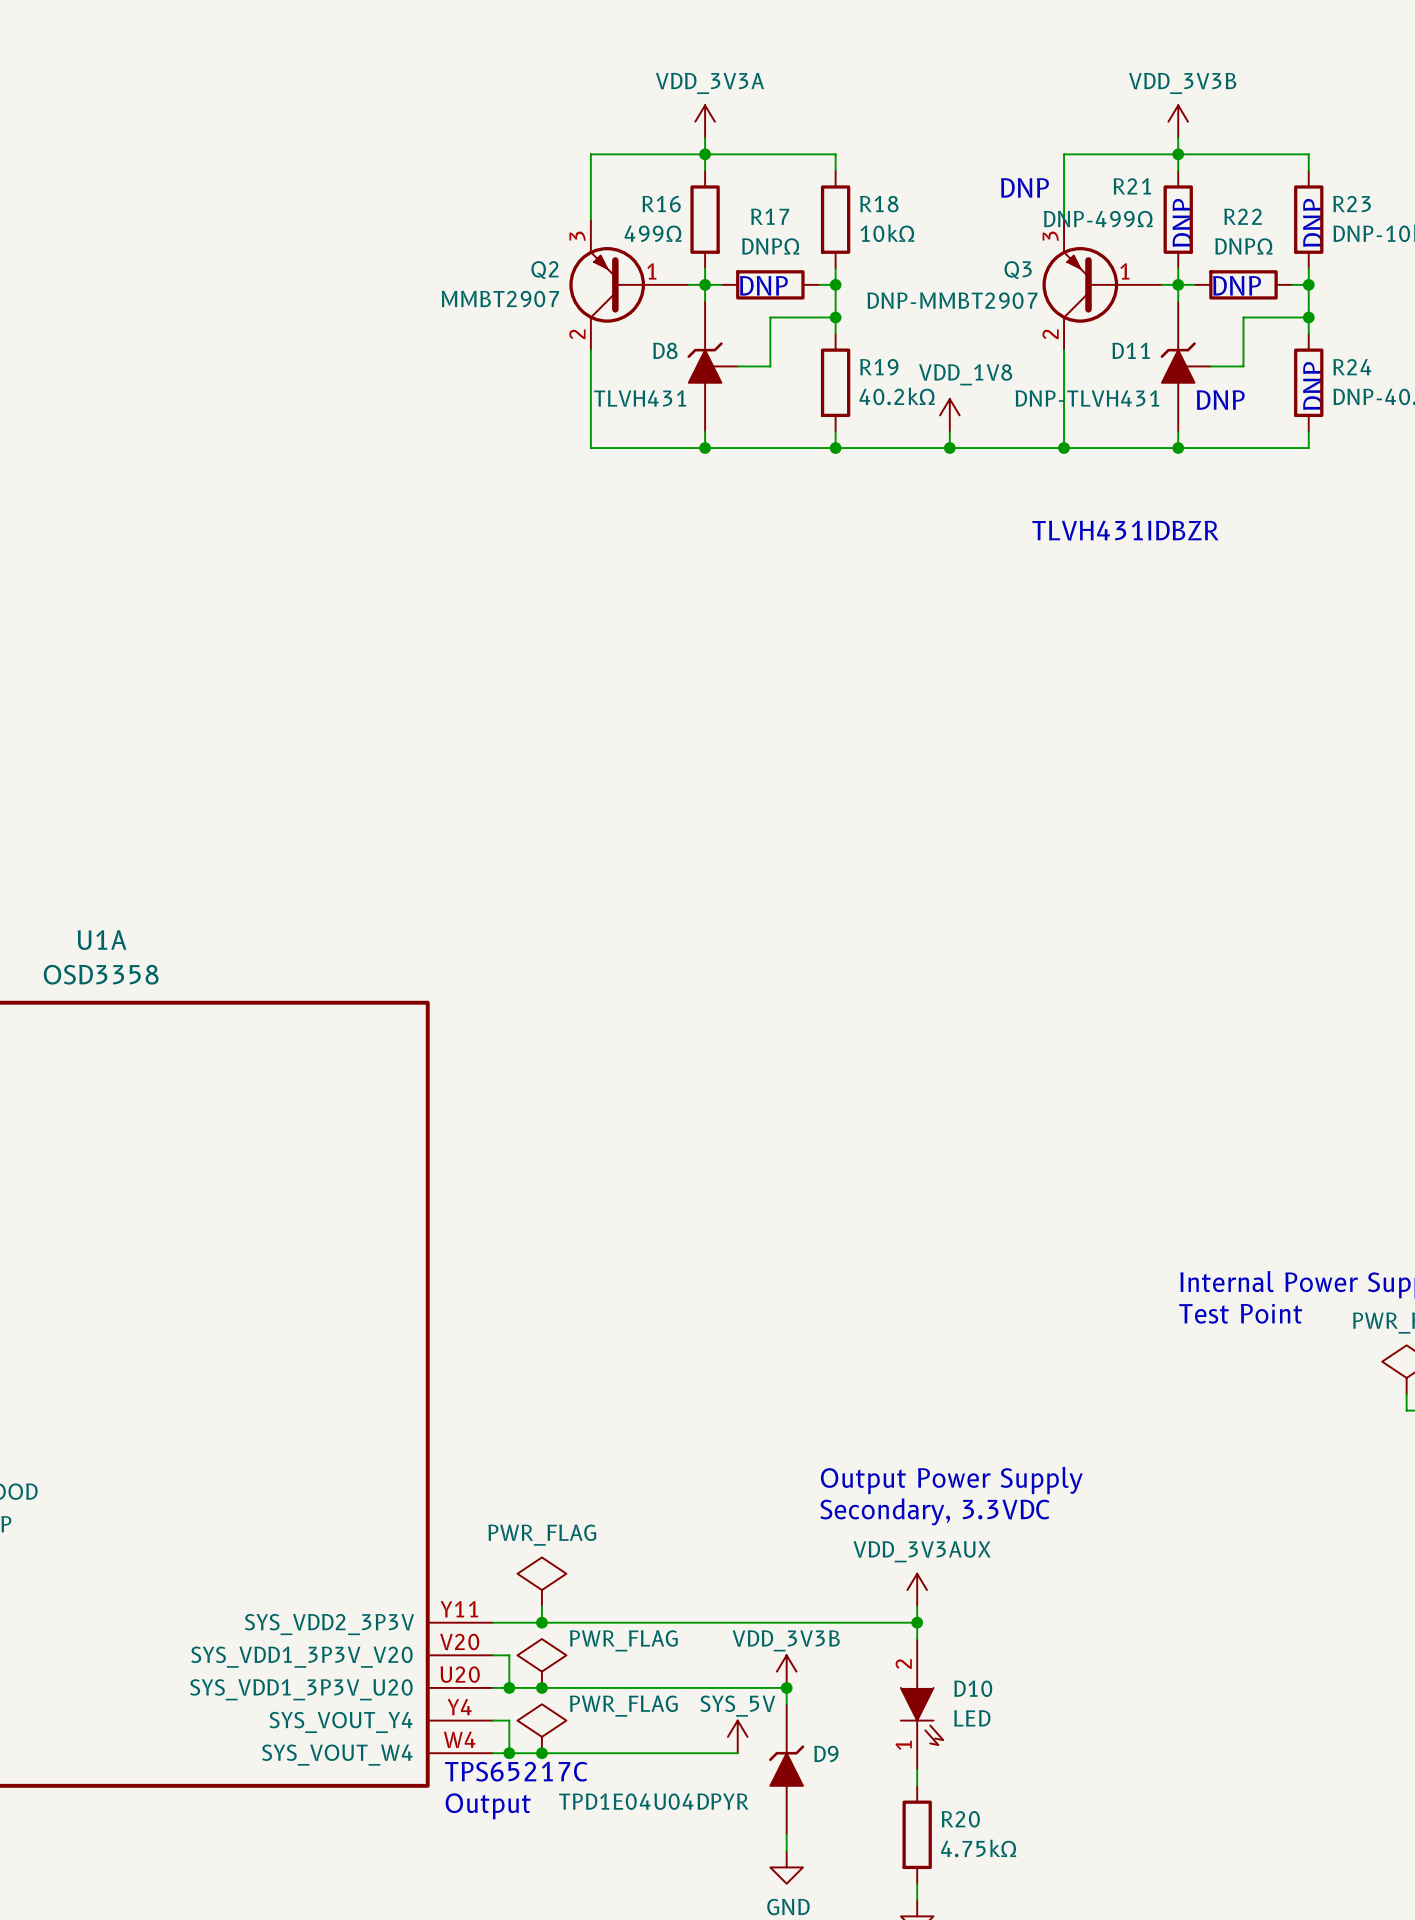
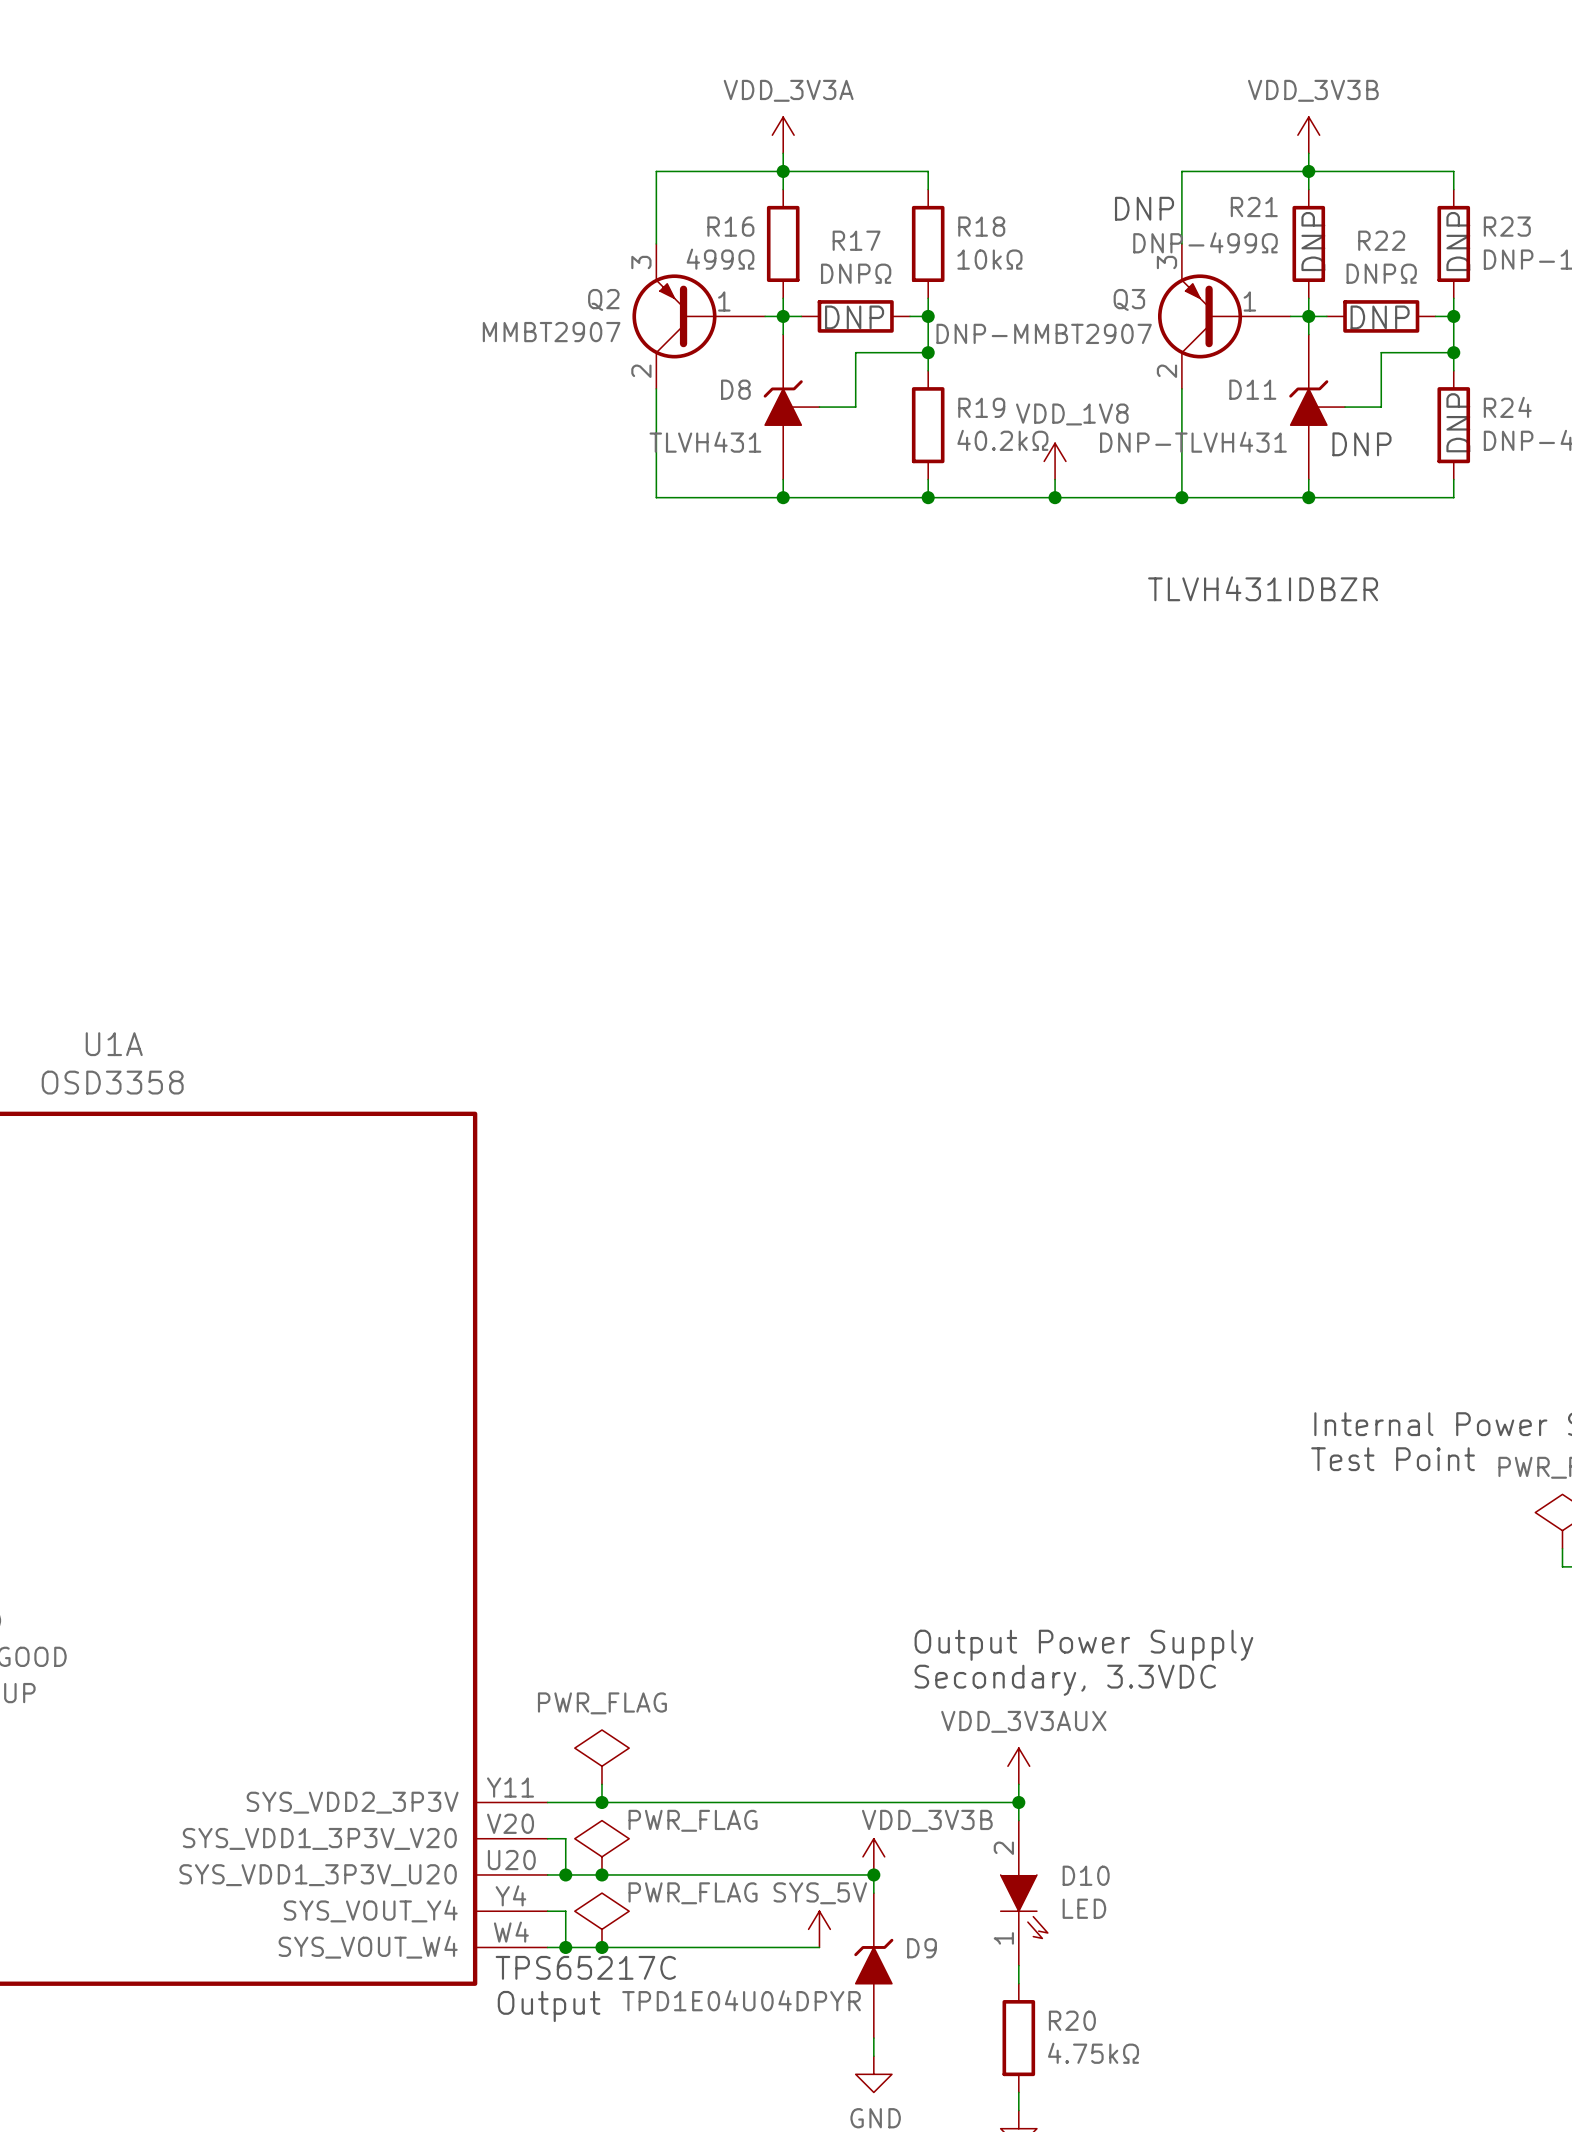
power symbol text position: VDD_3V3B (786, 1640) -> VDD_3V3B (927, 1820)

